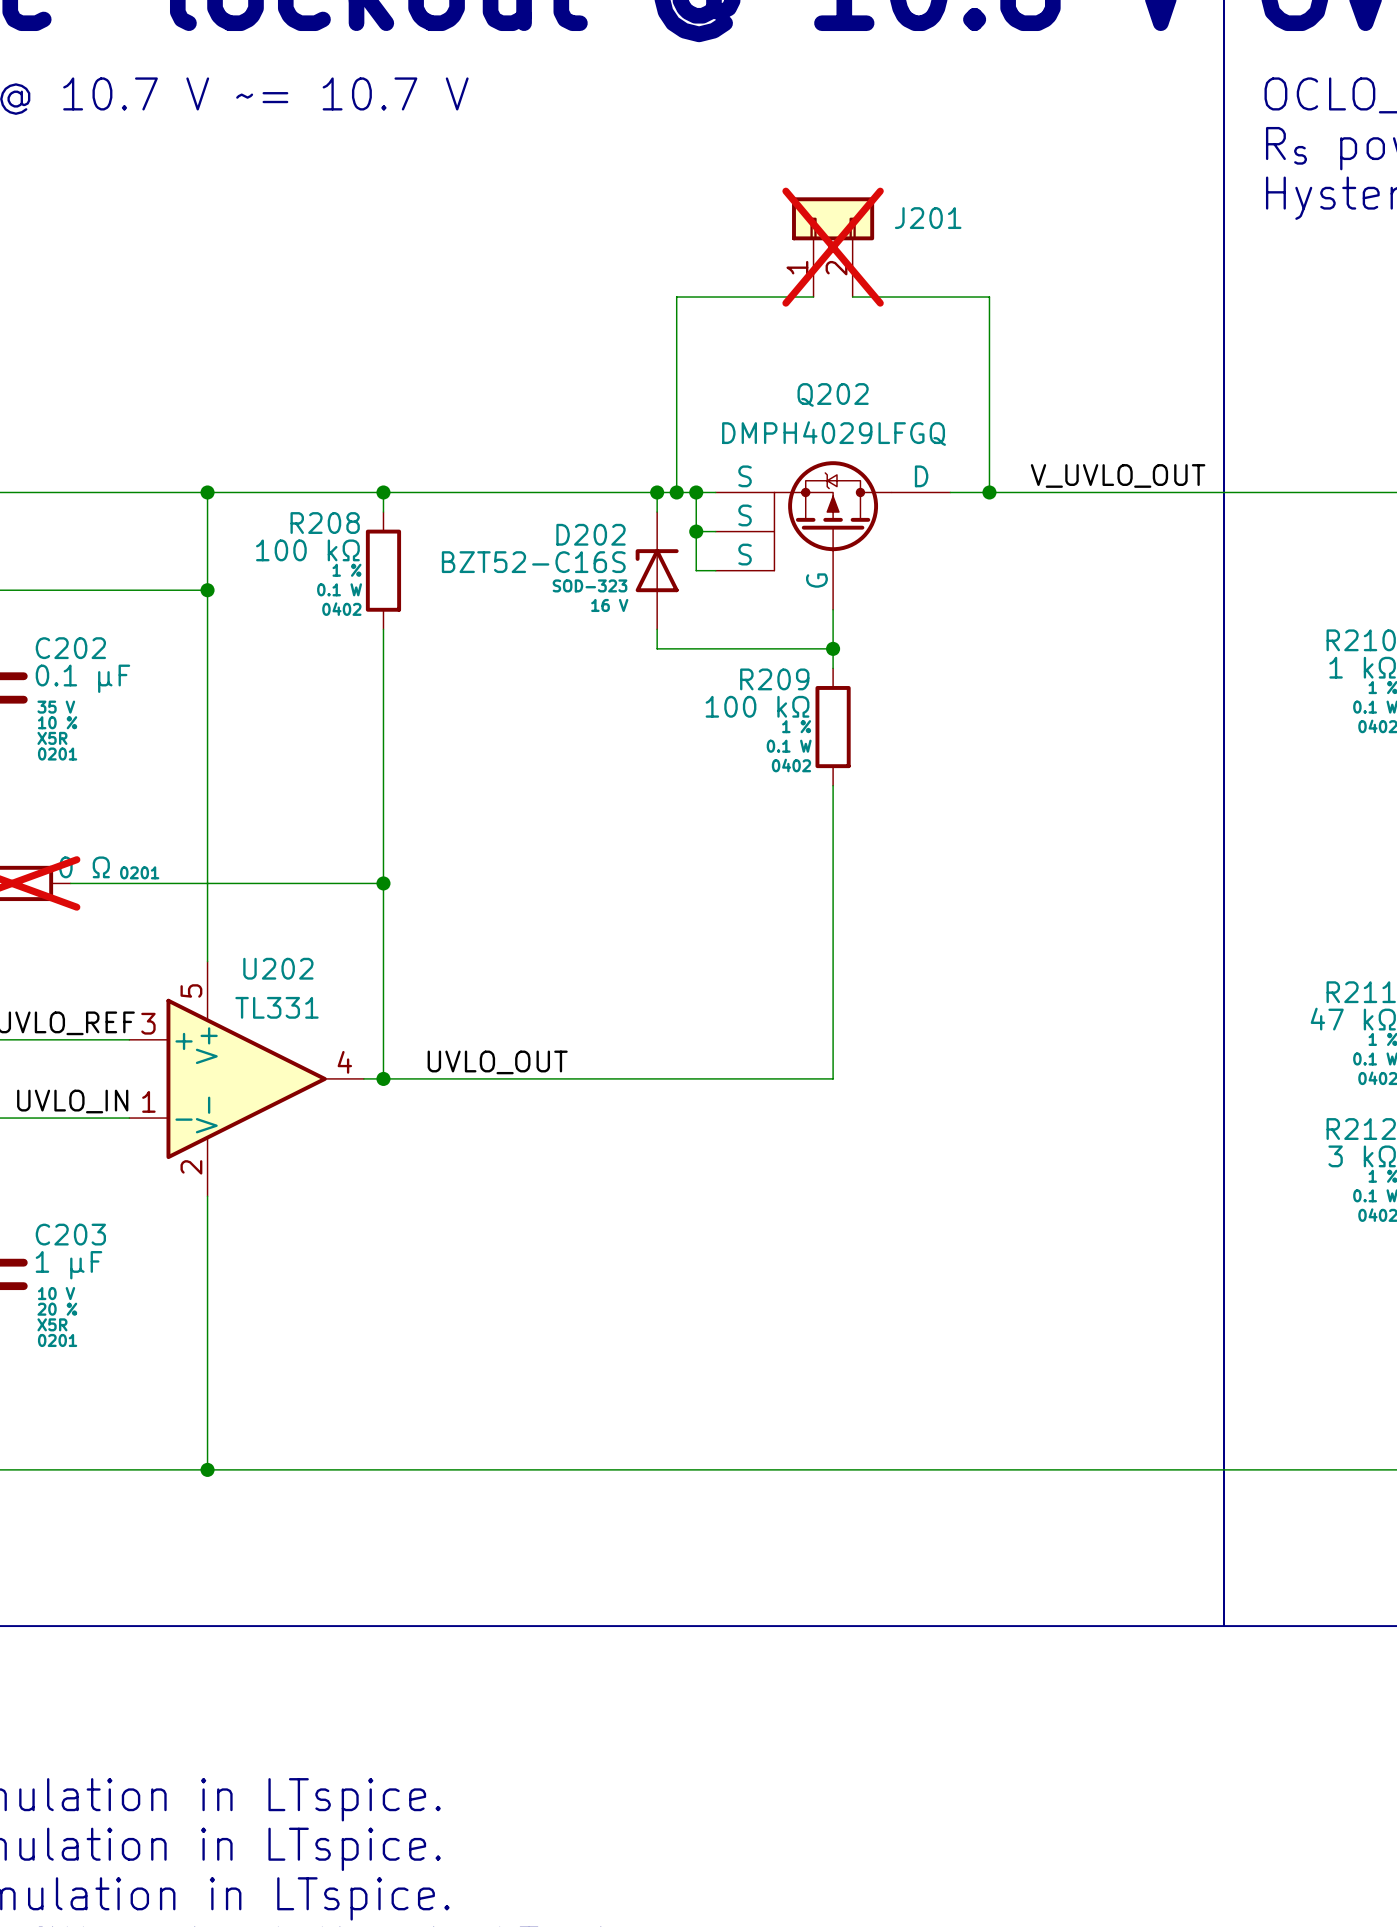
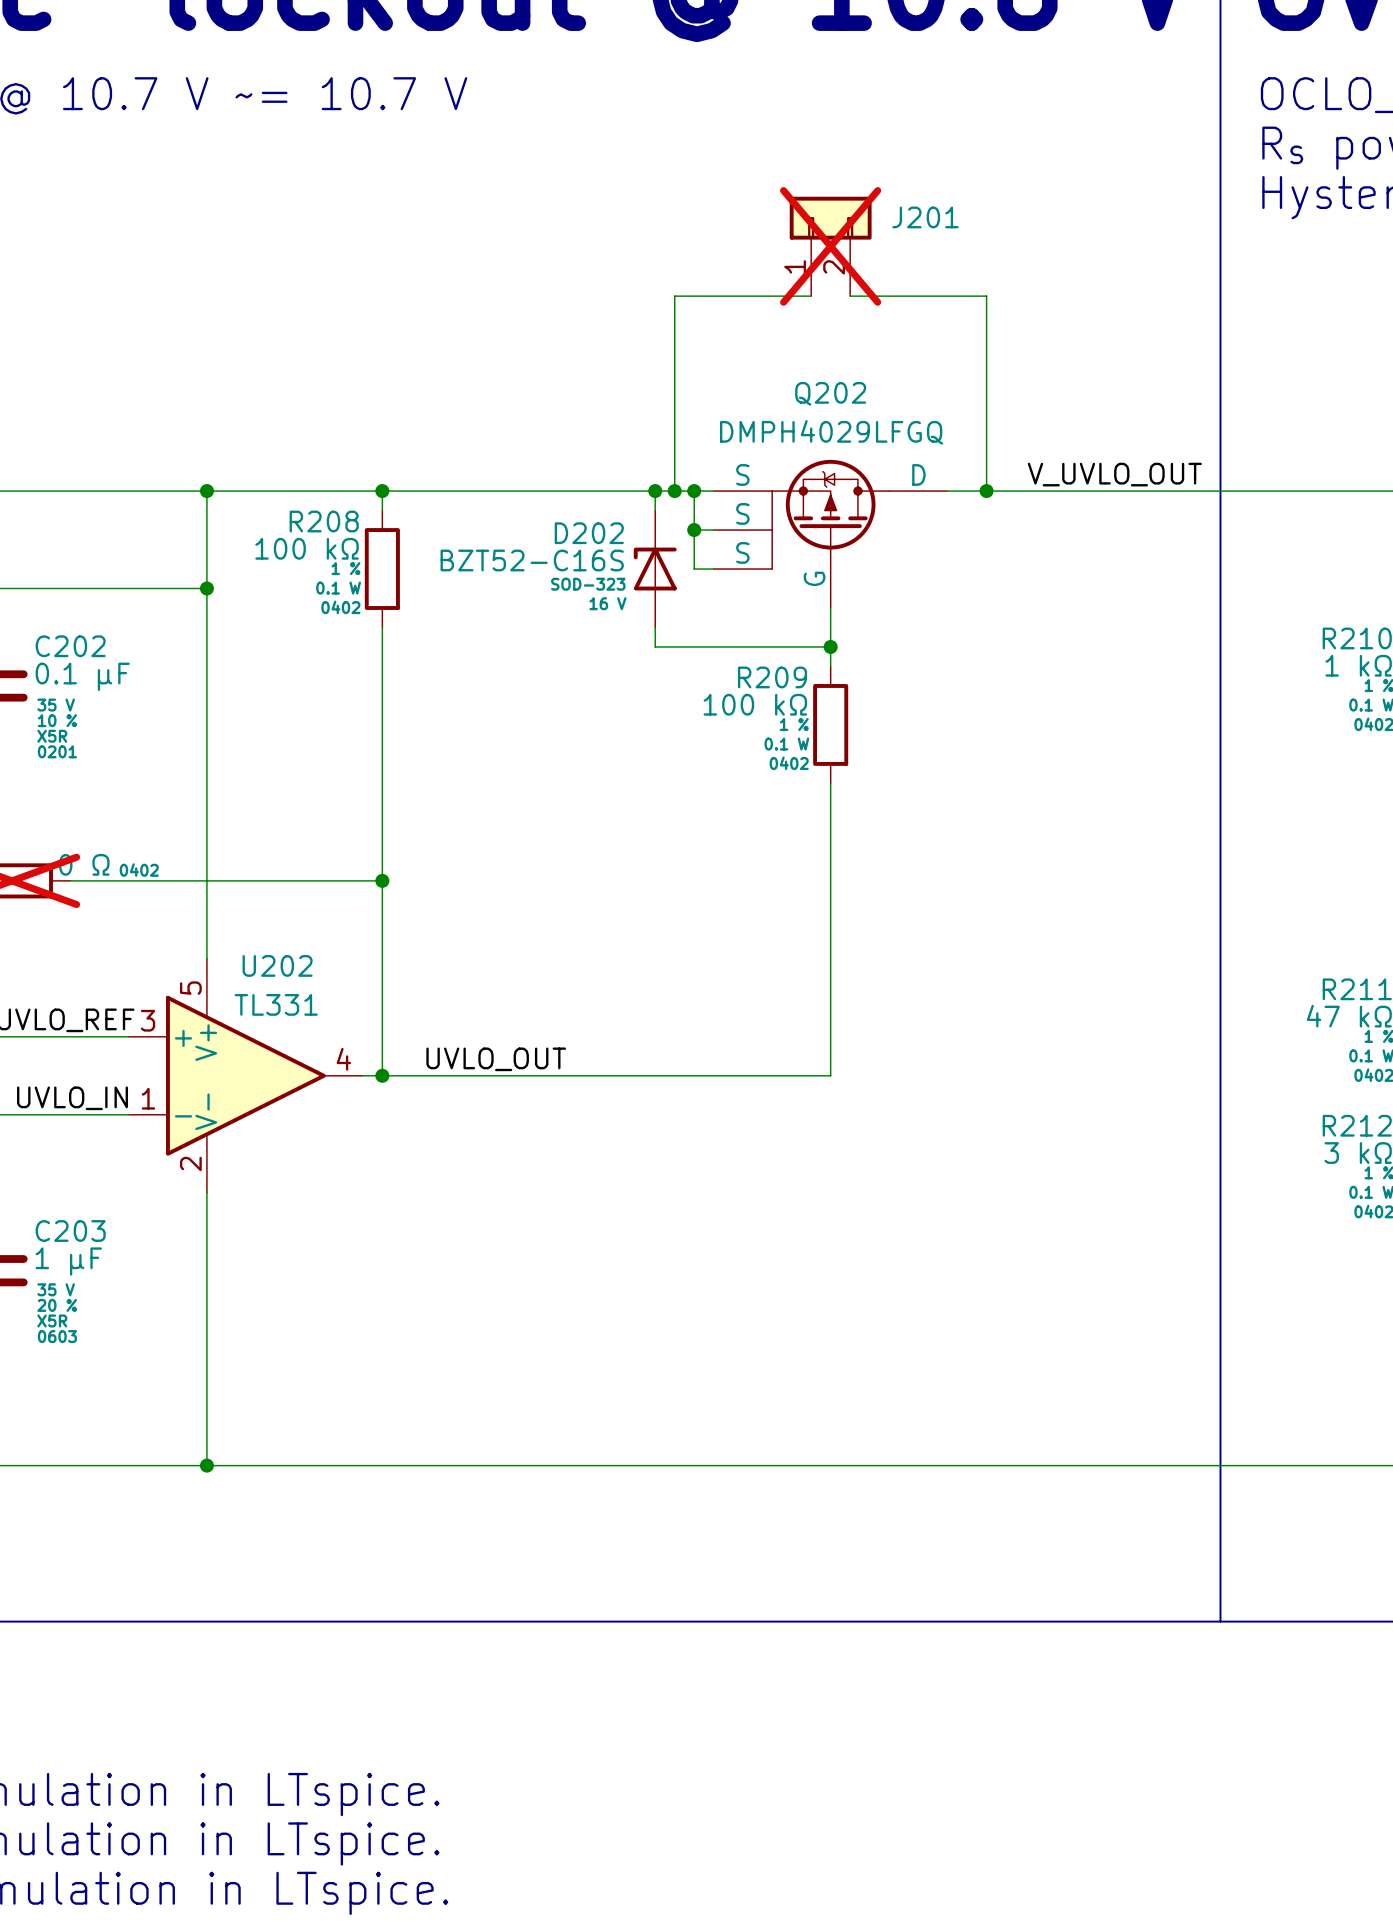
part text: 0201 (139, 872) -> 0402 (139, 870)
C203 text: 10 V (56, 1293) -> 35 V (56, 1289)
C203 text: 0201 (57, 1340) -> 0603 (57, 1336)

